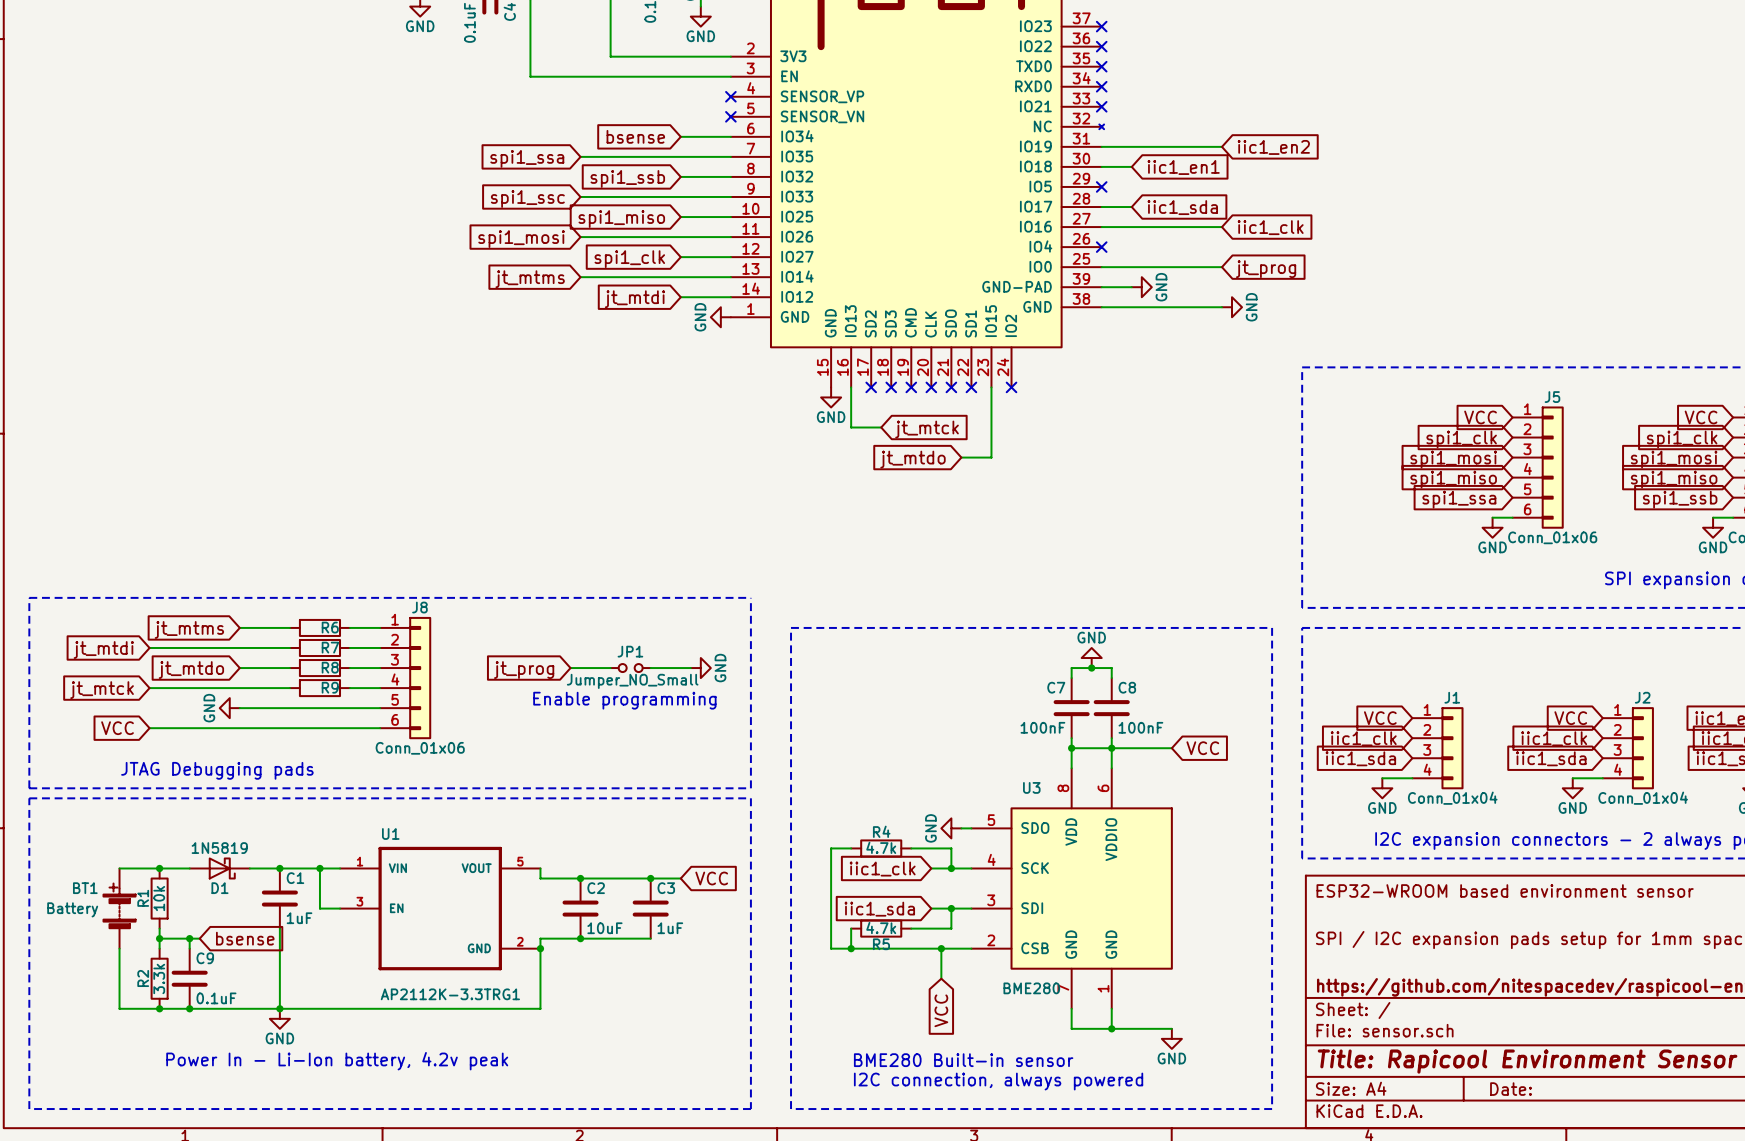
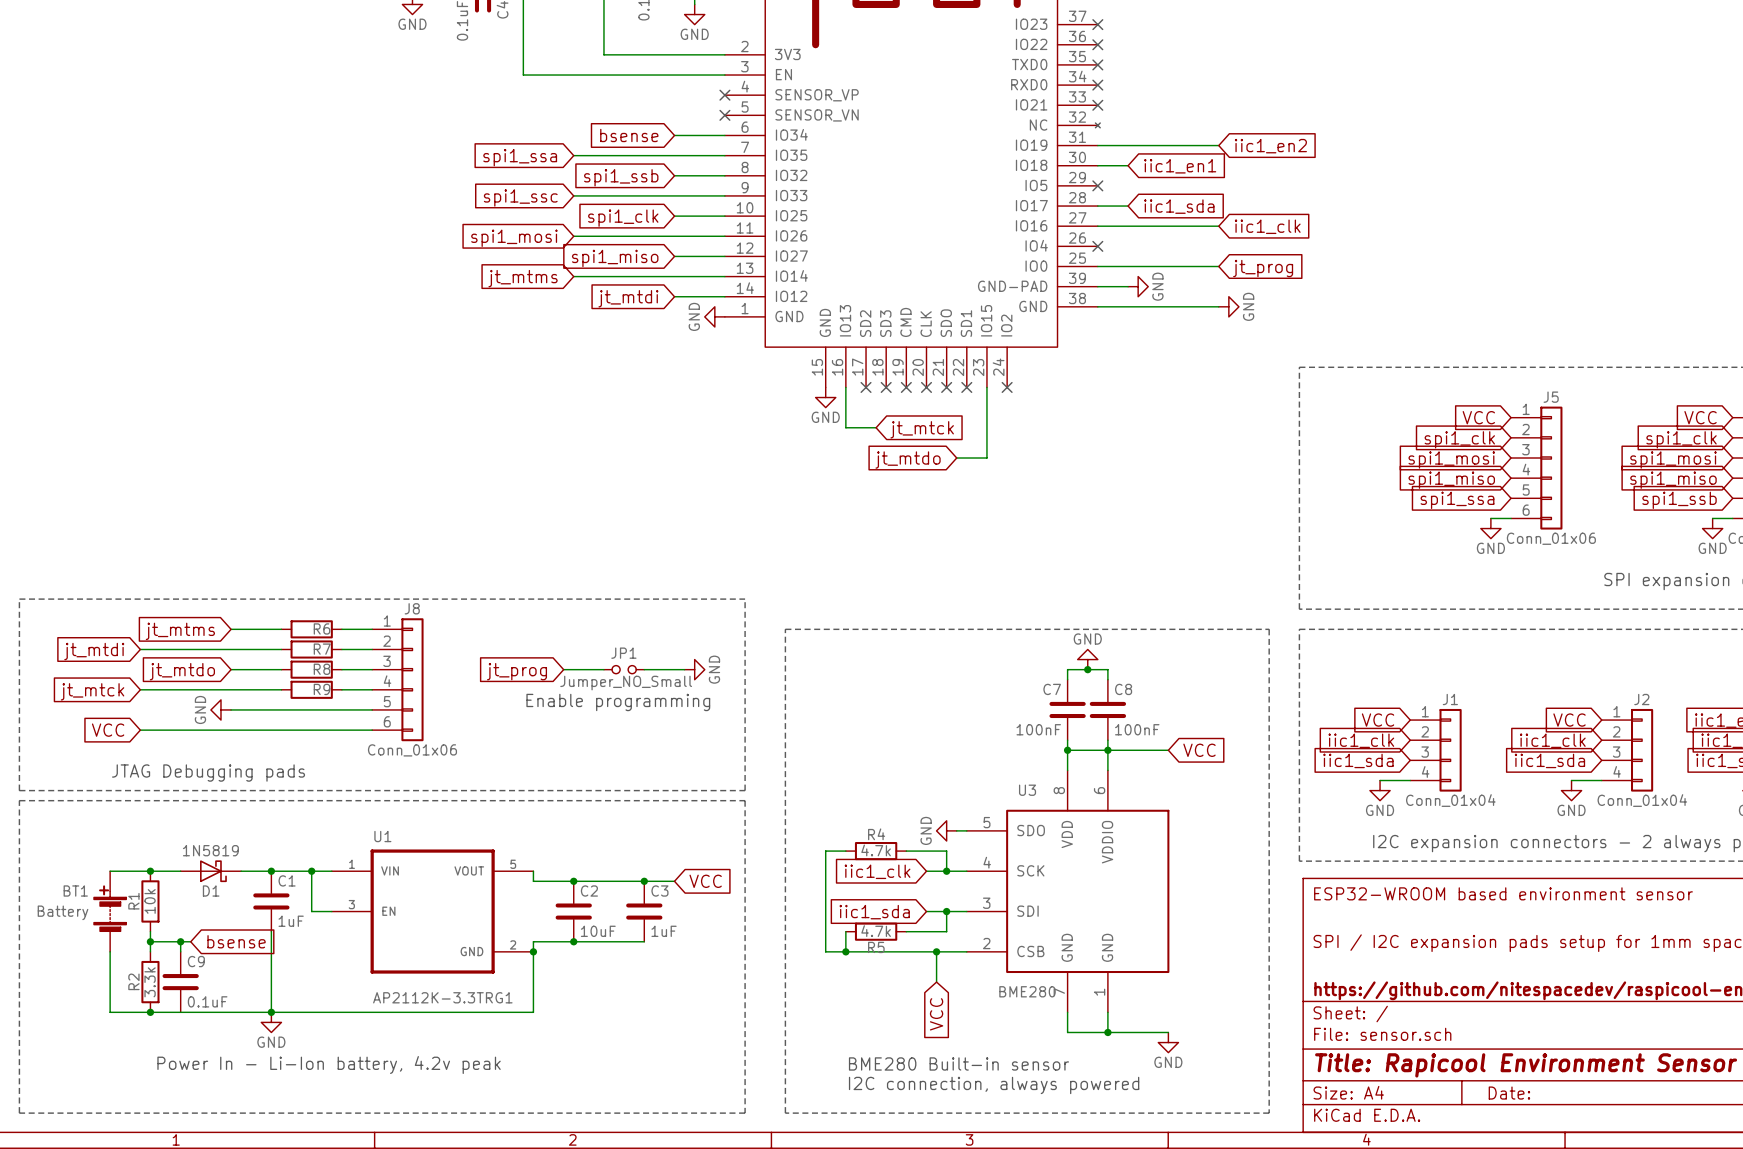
global label: spi1_miso (621, 219) -> spi1_clk (623, 218)
global label: spi1_clk (629, 259) -> spi1_miso (615, 258)
junction: (189, 1008) -> none

